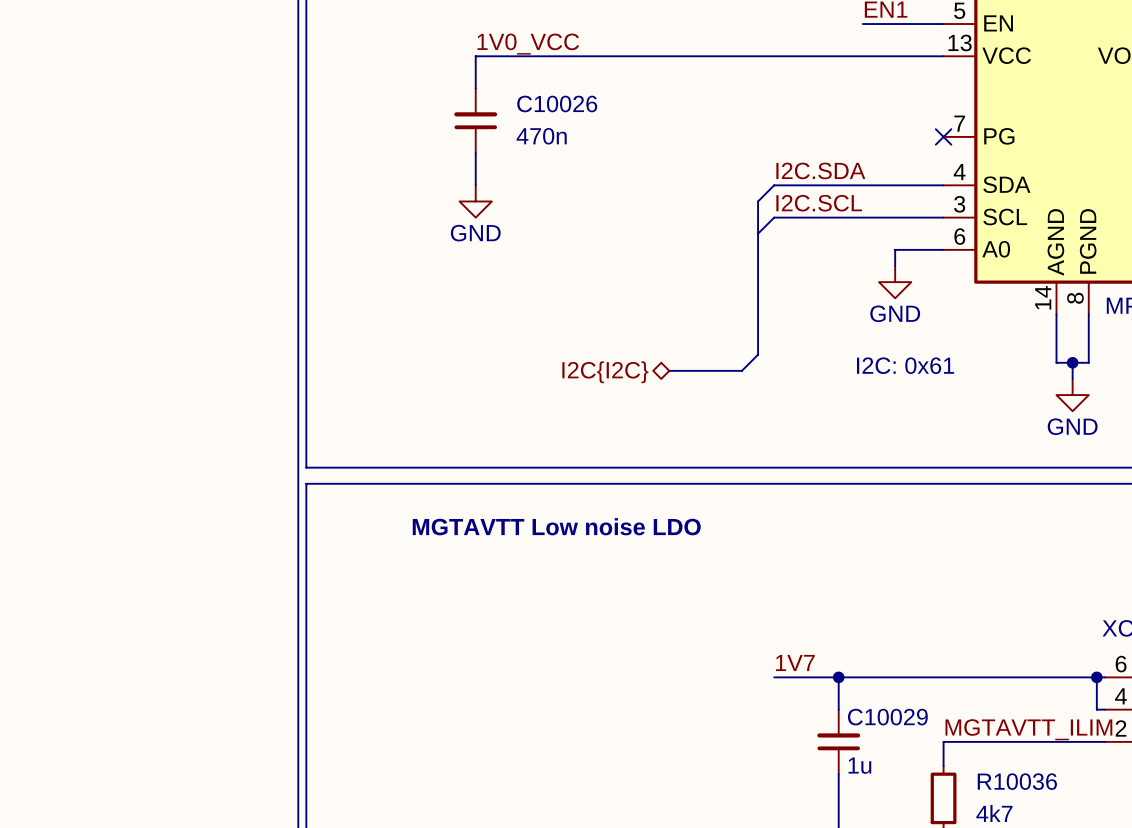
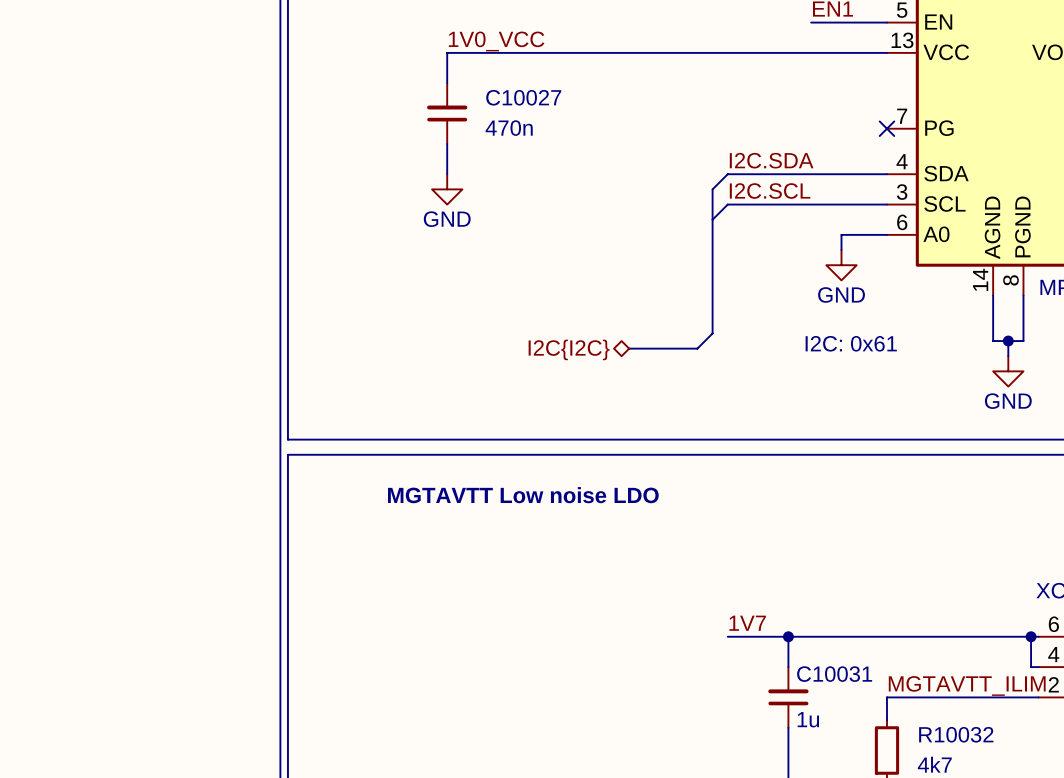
C10026 name: C10026 (557, 103) -> C10027 (523, 97)
C10029 name: C10029 (887, 717) -> C10031 (834, 674)
R10036 name: R10036 (1017, 781) -> R10032 (956, 734)

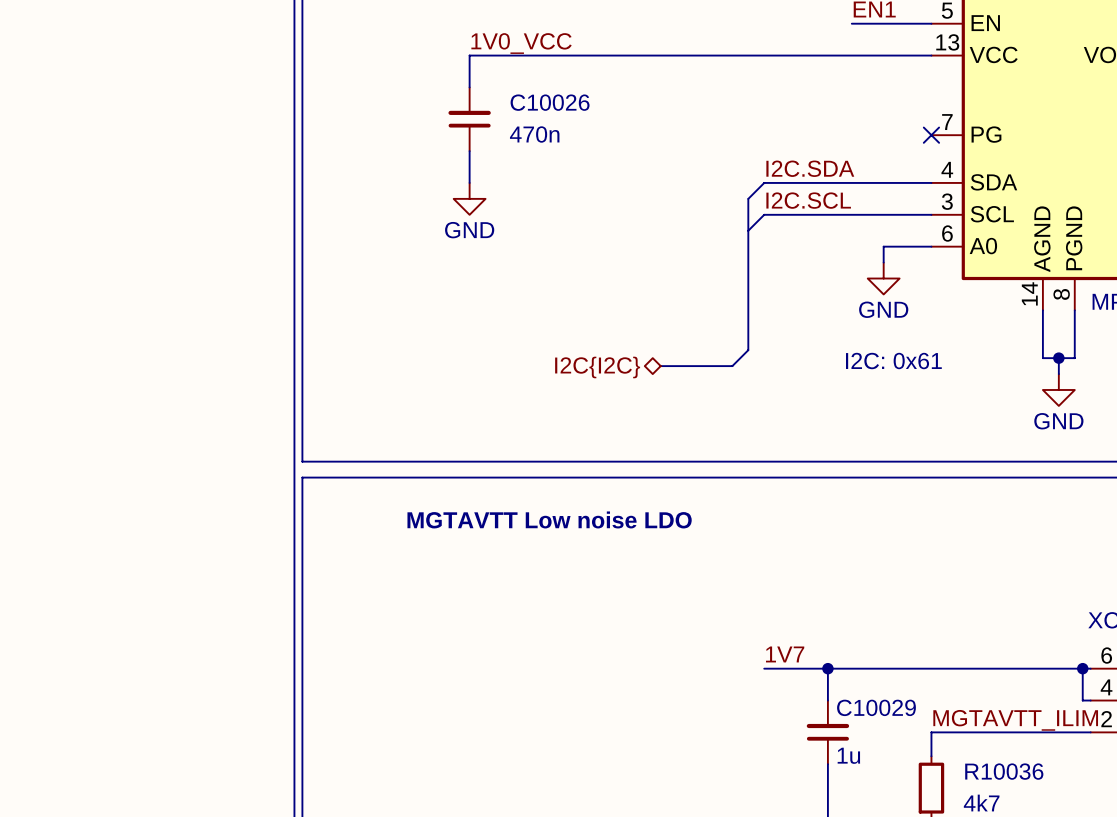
C10027 name: C10027 (523, 97) -> C10026 (550, 102)
C10031 name: C10031 (834, 674) -> C10029 (876, 707)
R10032 name: R10032 (956, 734) -> R10036 (1004, 771)

